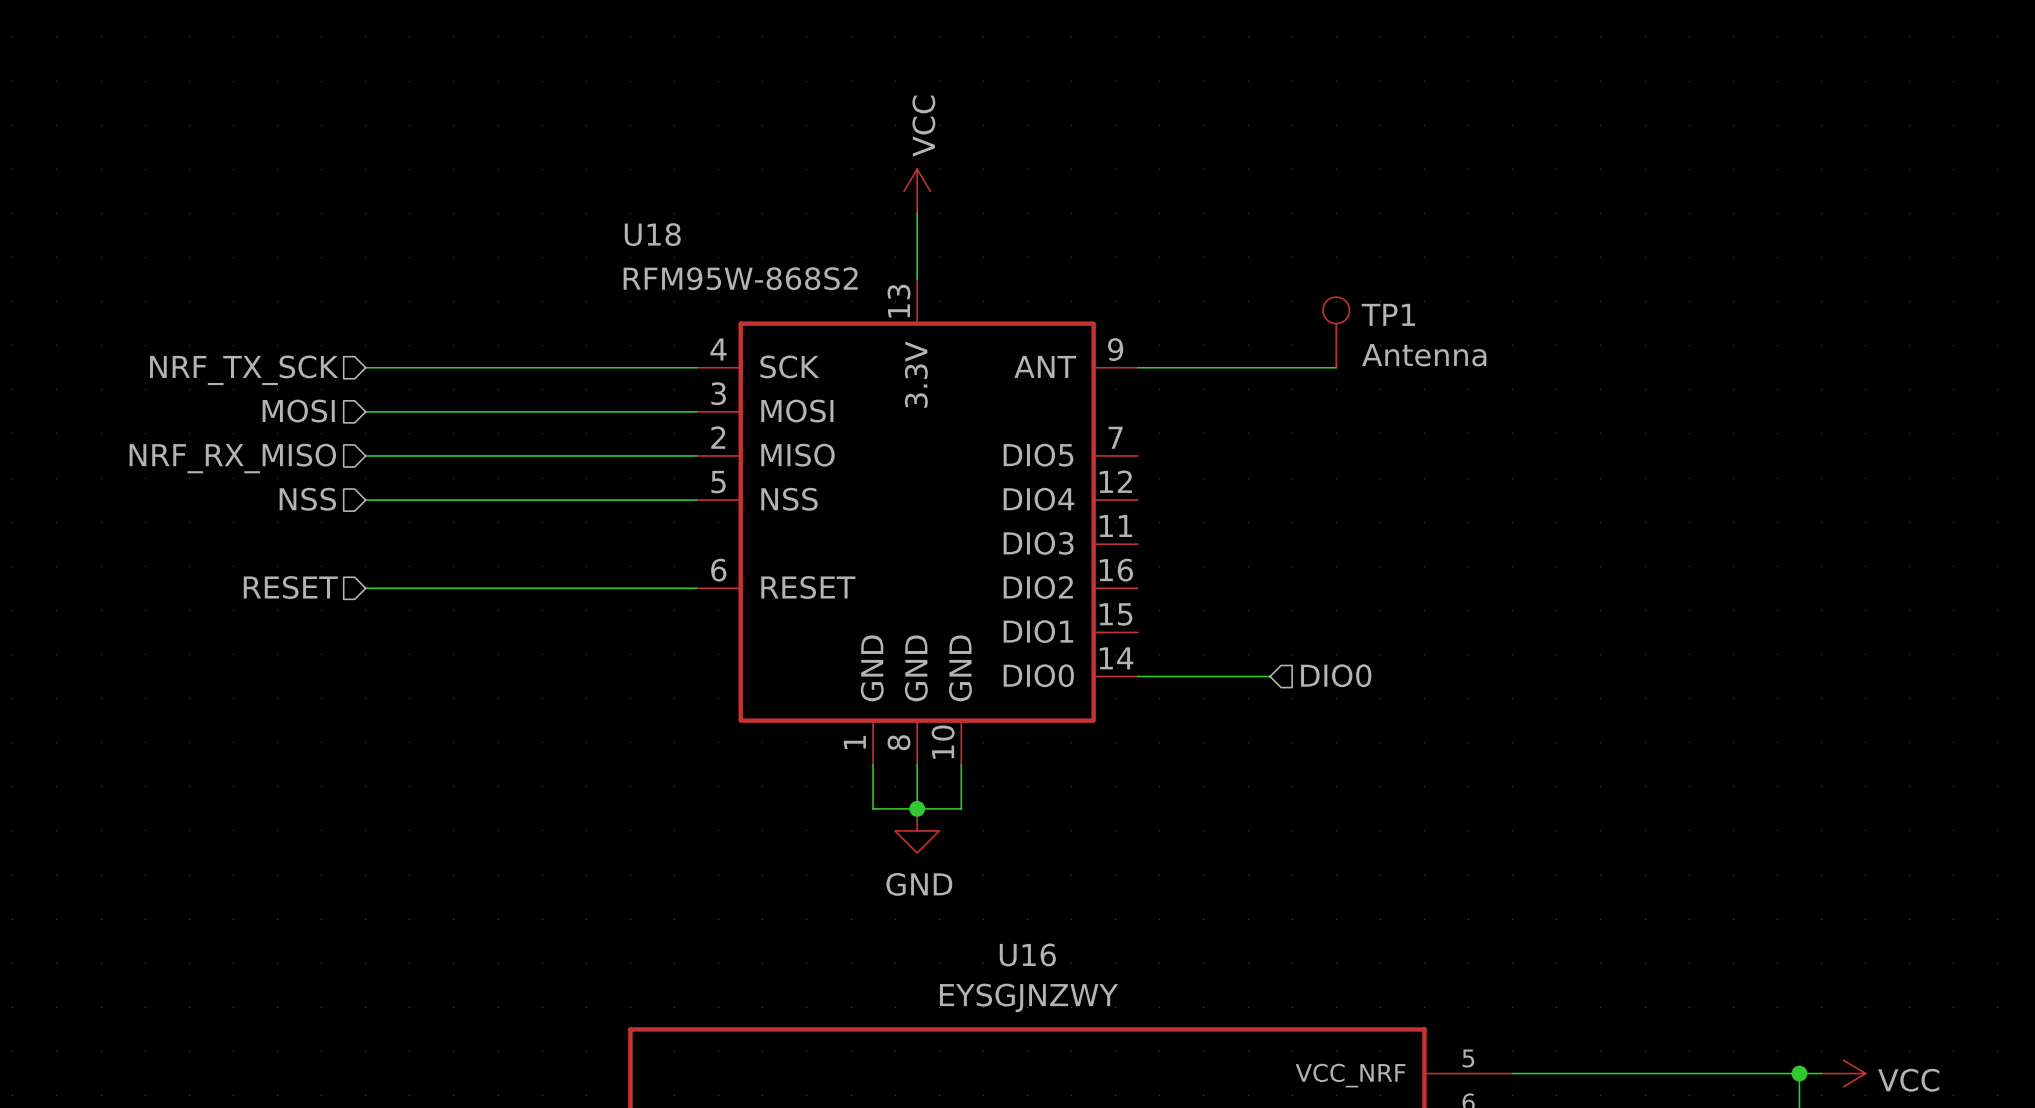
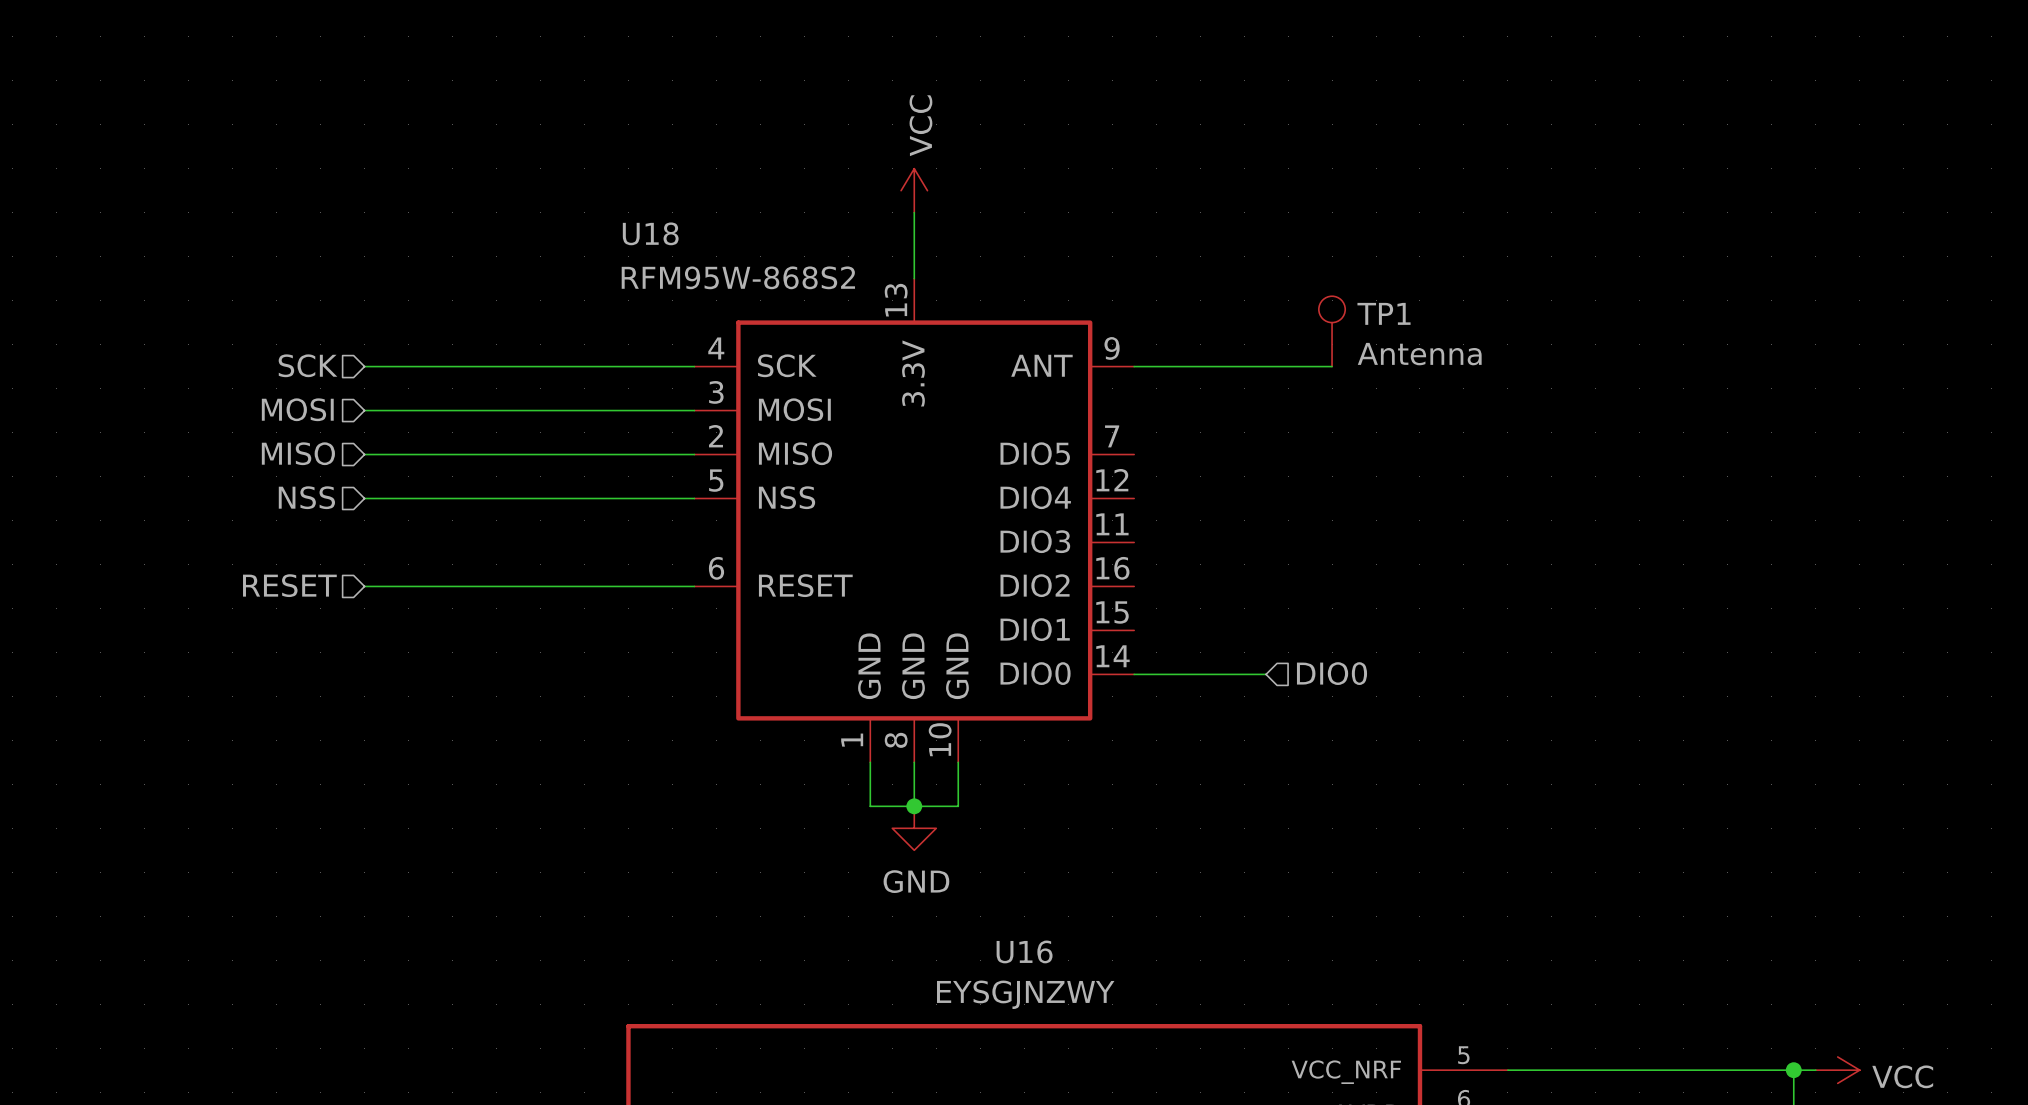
hierarchical label: NRF_TX_SCK (244, 370) -> SCK (308, 365)
hierarchical label: NRF_RX_MISO (232, 458) -> MISO (298, 453)

